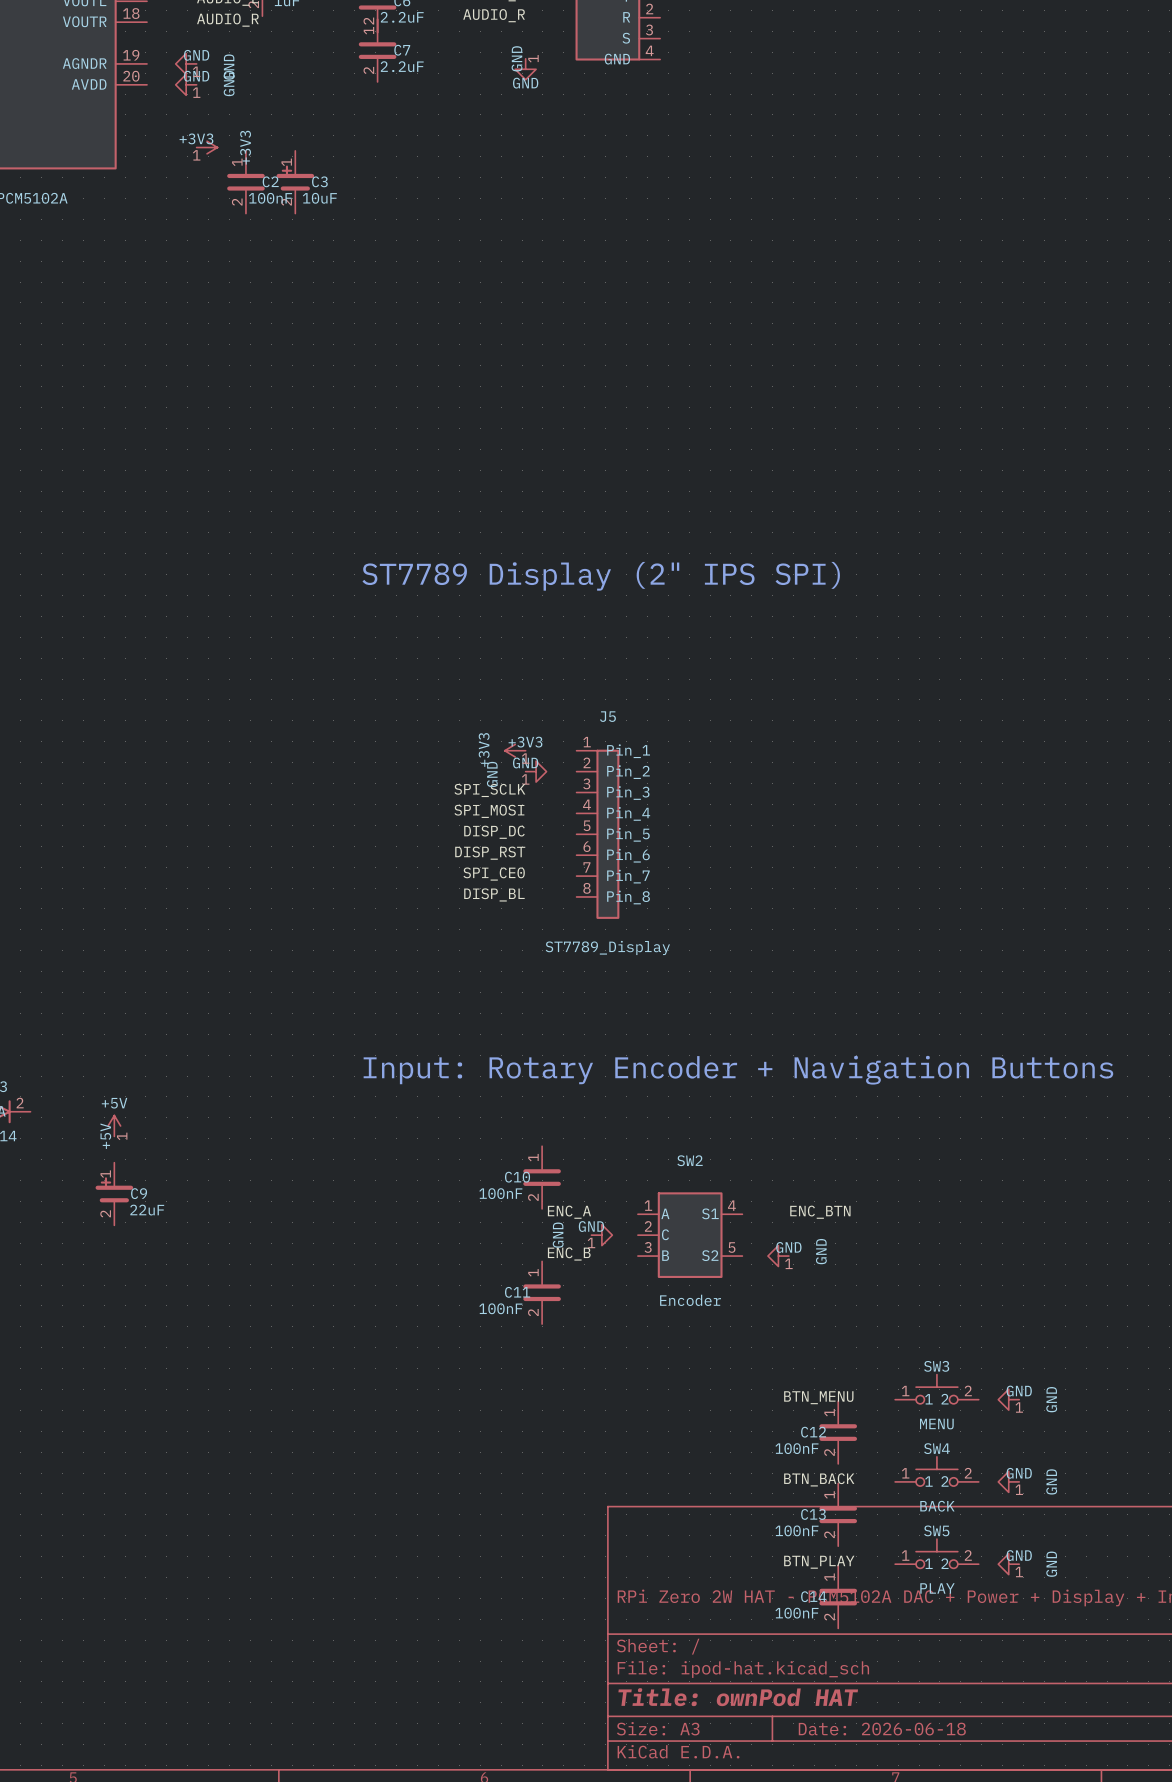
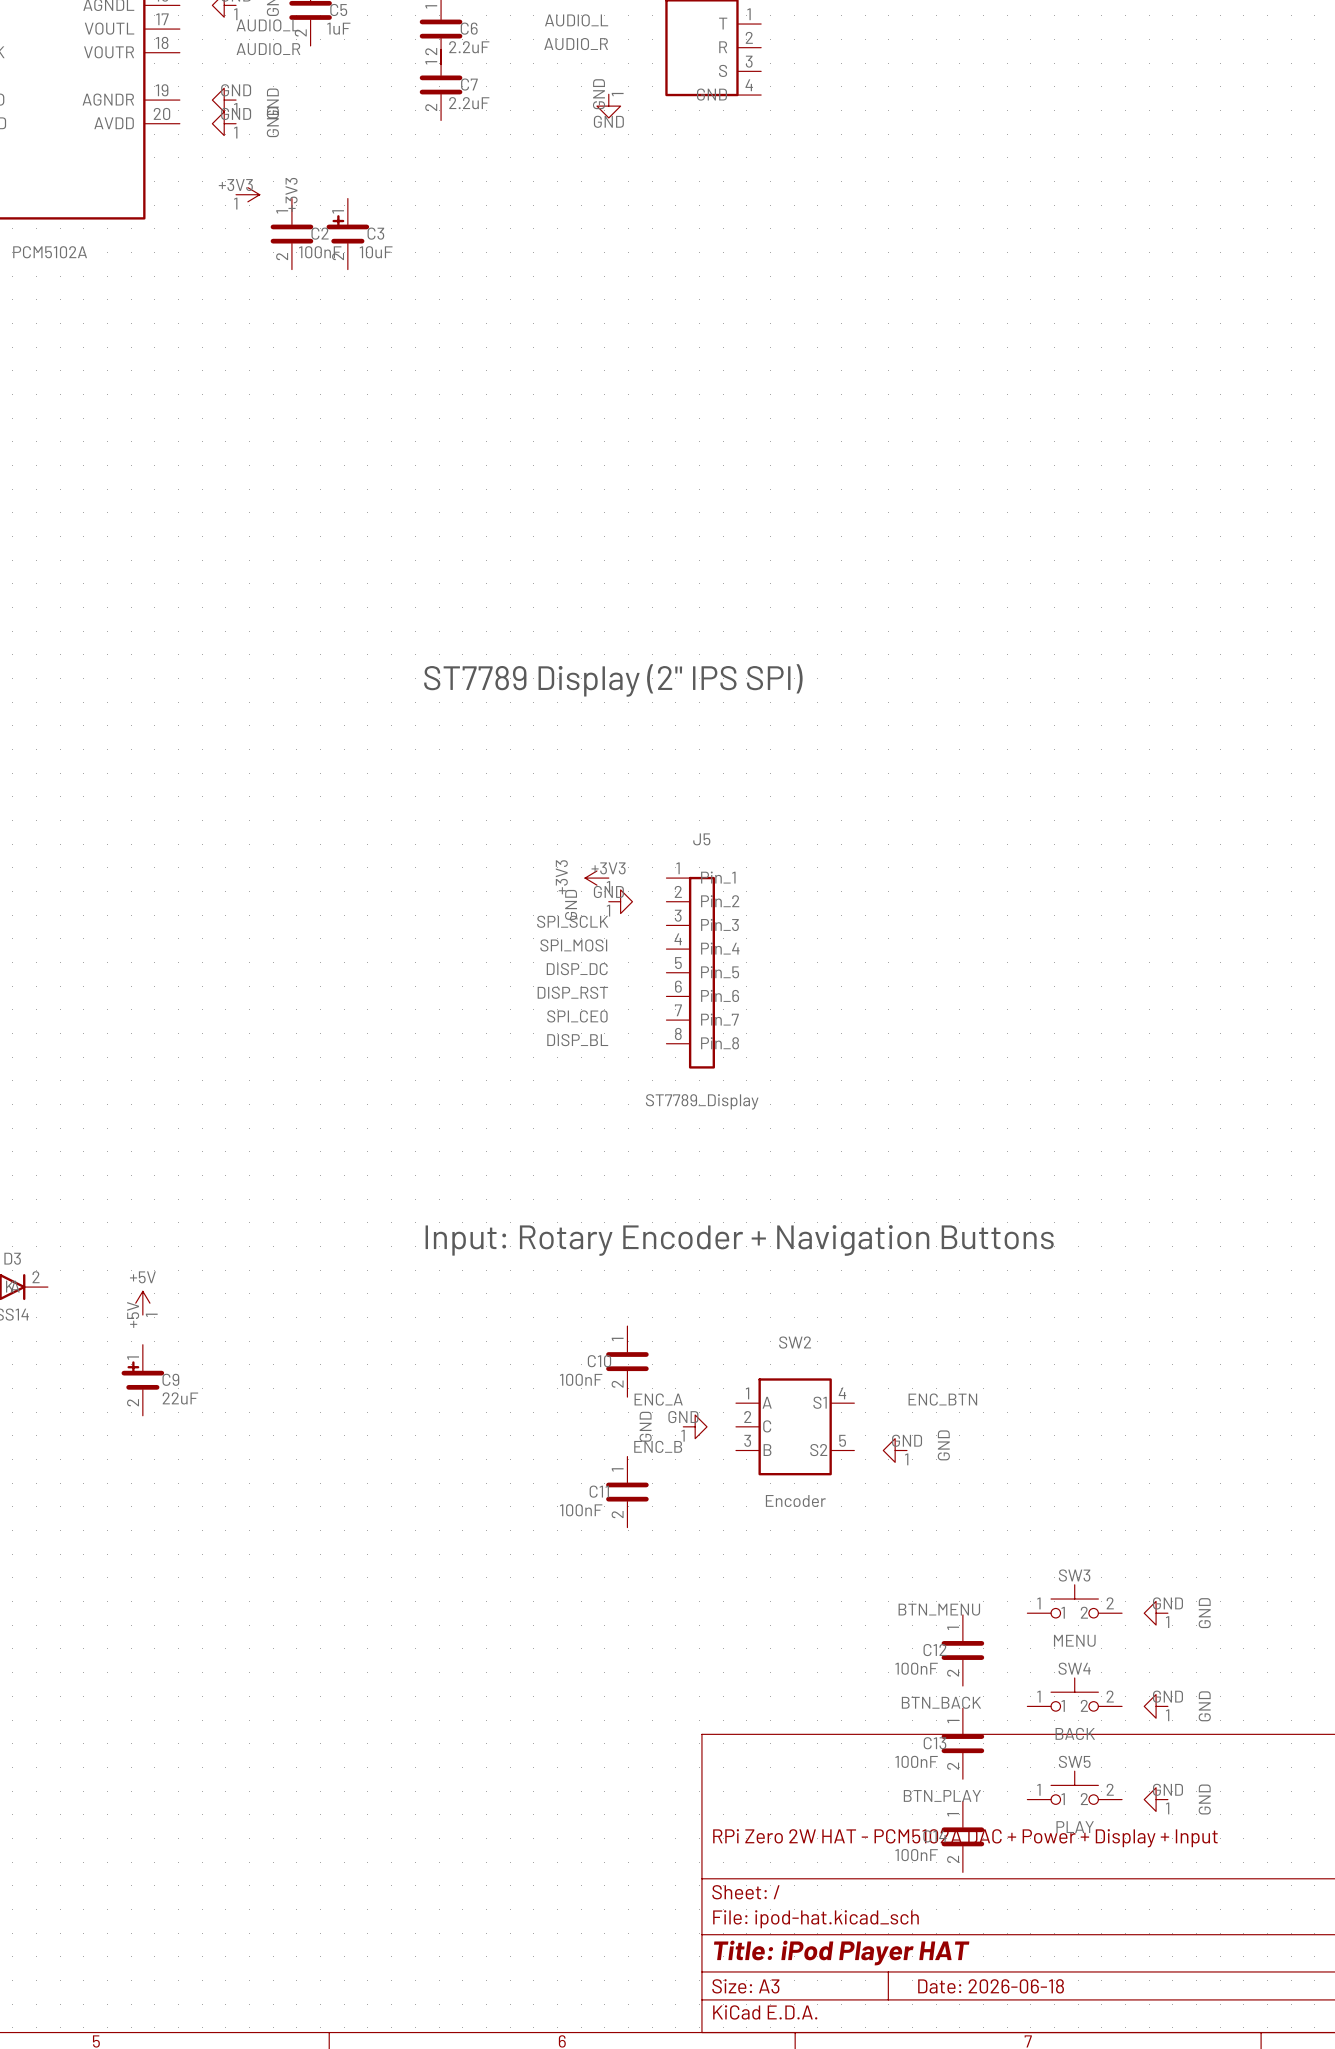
title block: Title: ownPod HAT (738, 1697) -> Title: iPod Player HAT (841, 1953)

